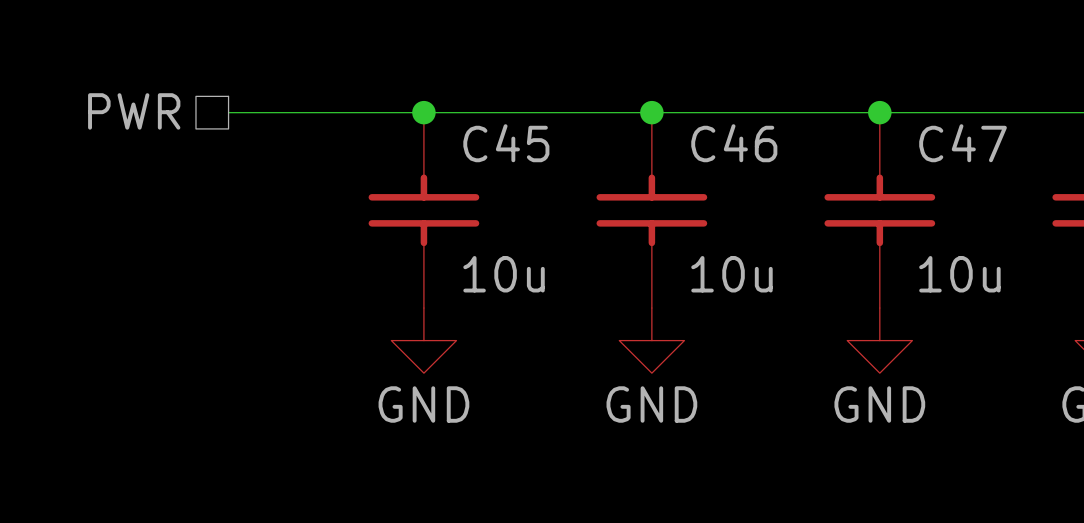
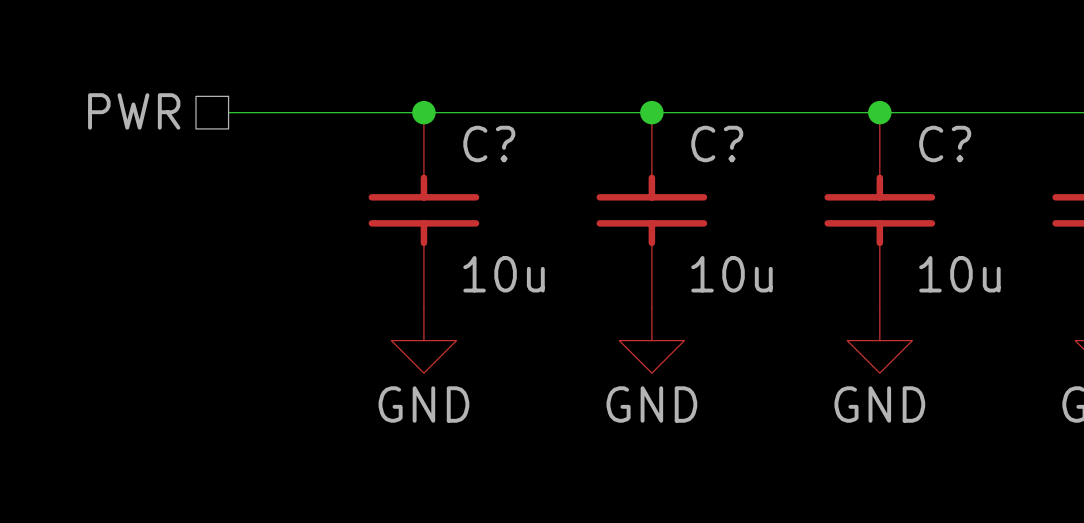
C45 name: C45 (506, 143) -> C? (489, 144)
C46 name: C46 (734, 143) -> C? (717, 144)
C47 name: C47 (963, 143) -> C? (945, 144)

